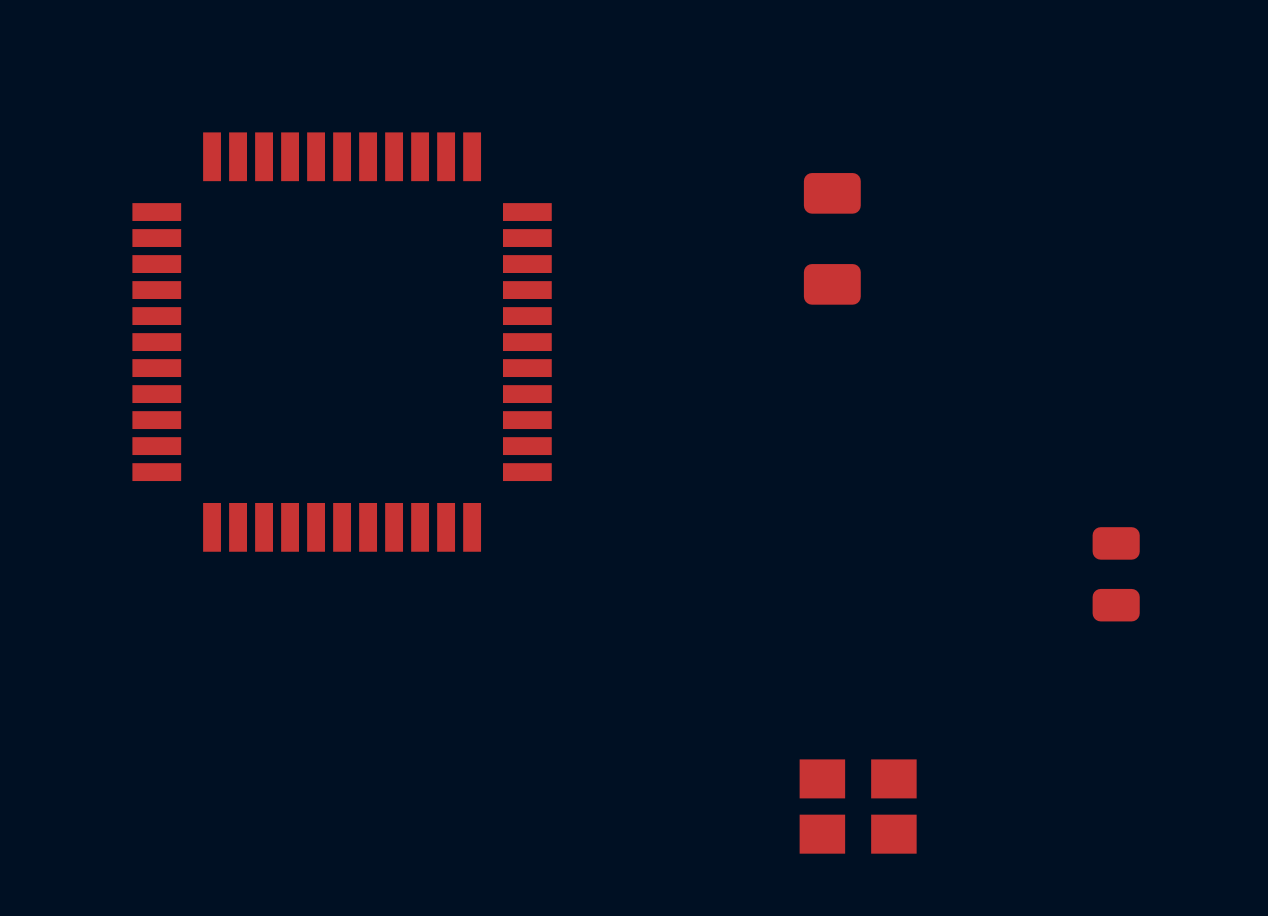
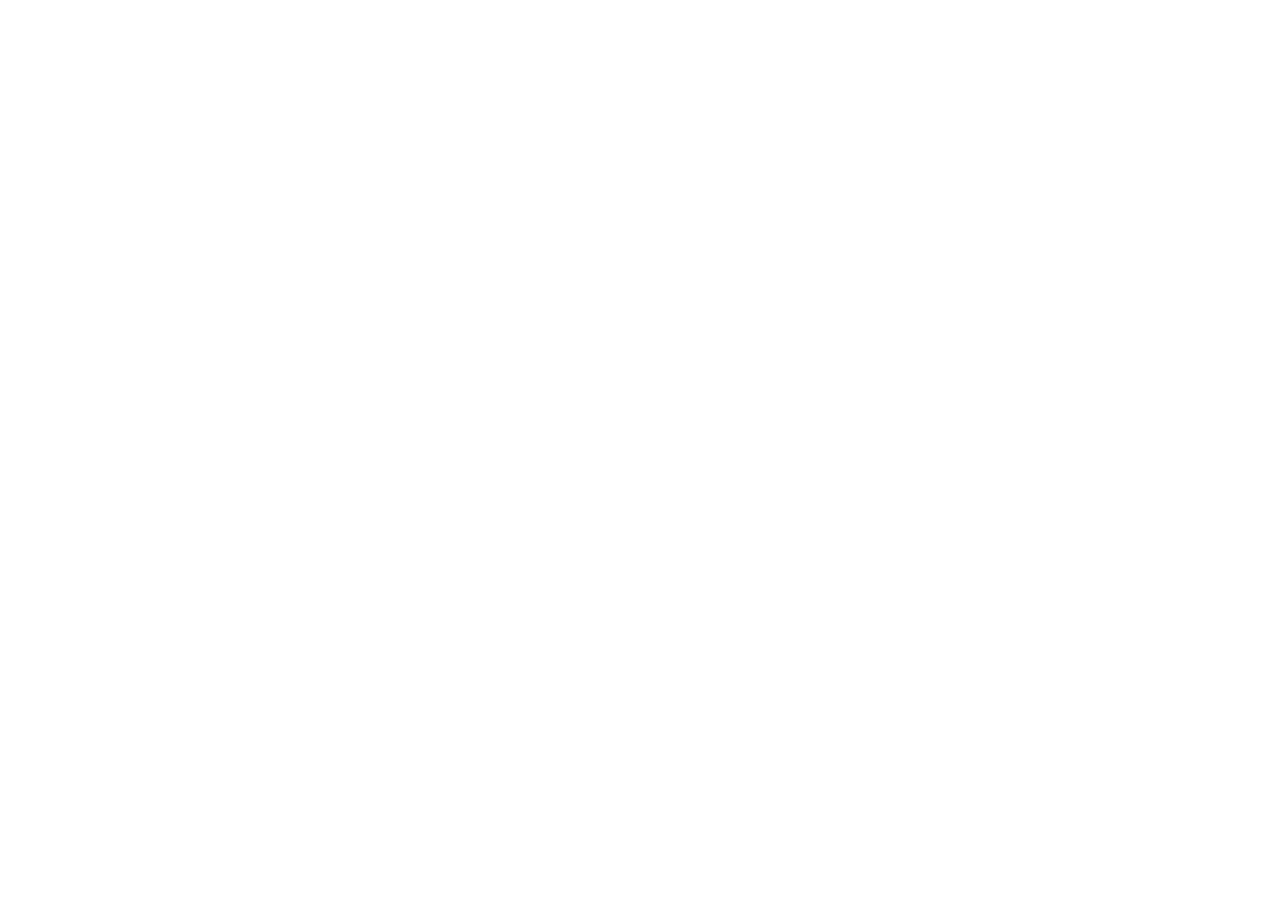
part: (832, 238) -> none
part: (342, 342) -> none
part: (1116, 574) -> none
part: (858, 806) -> none

